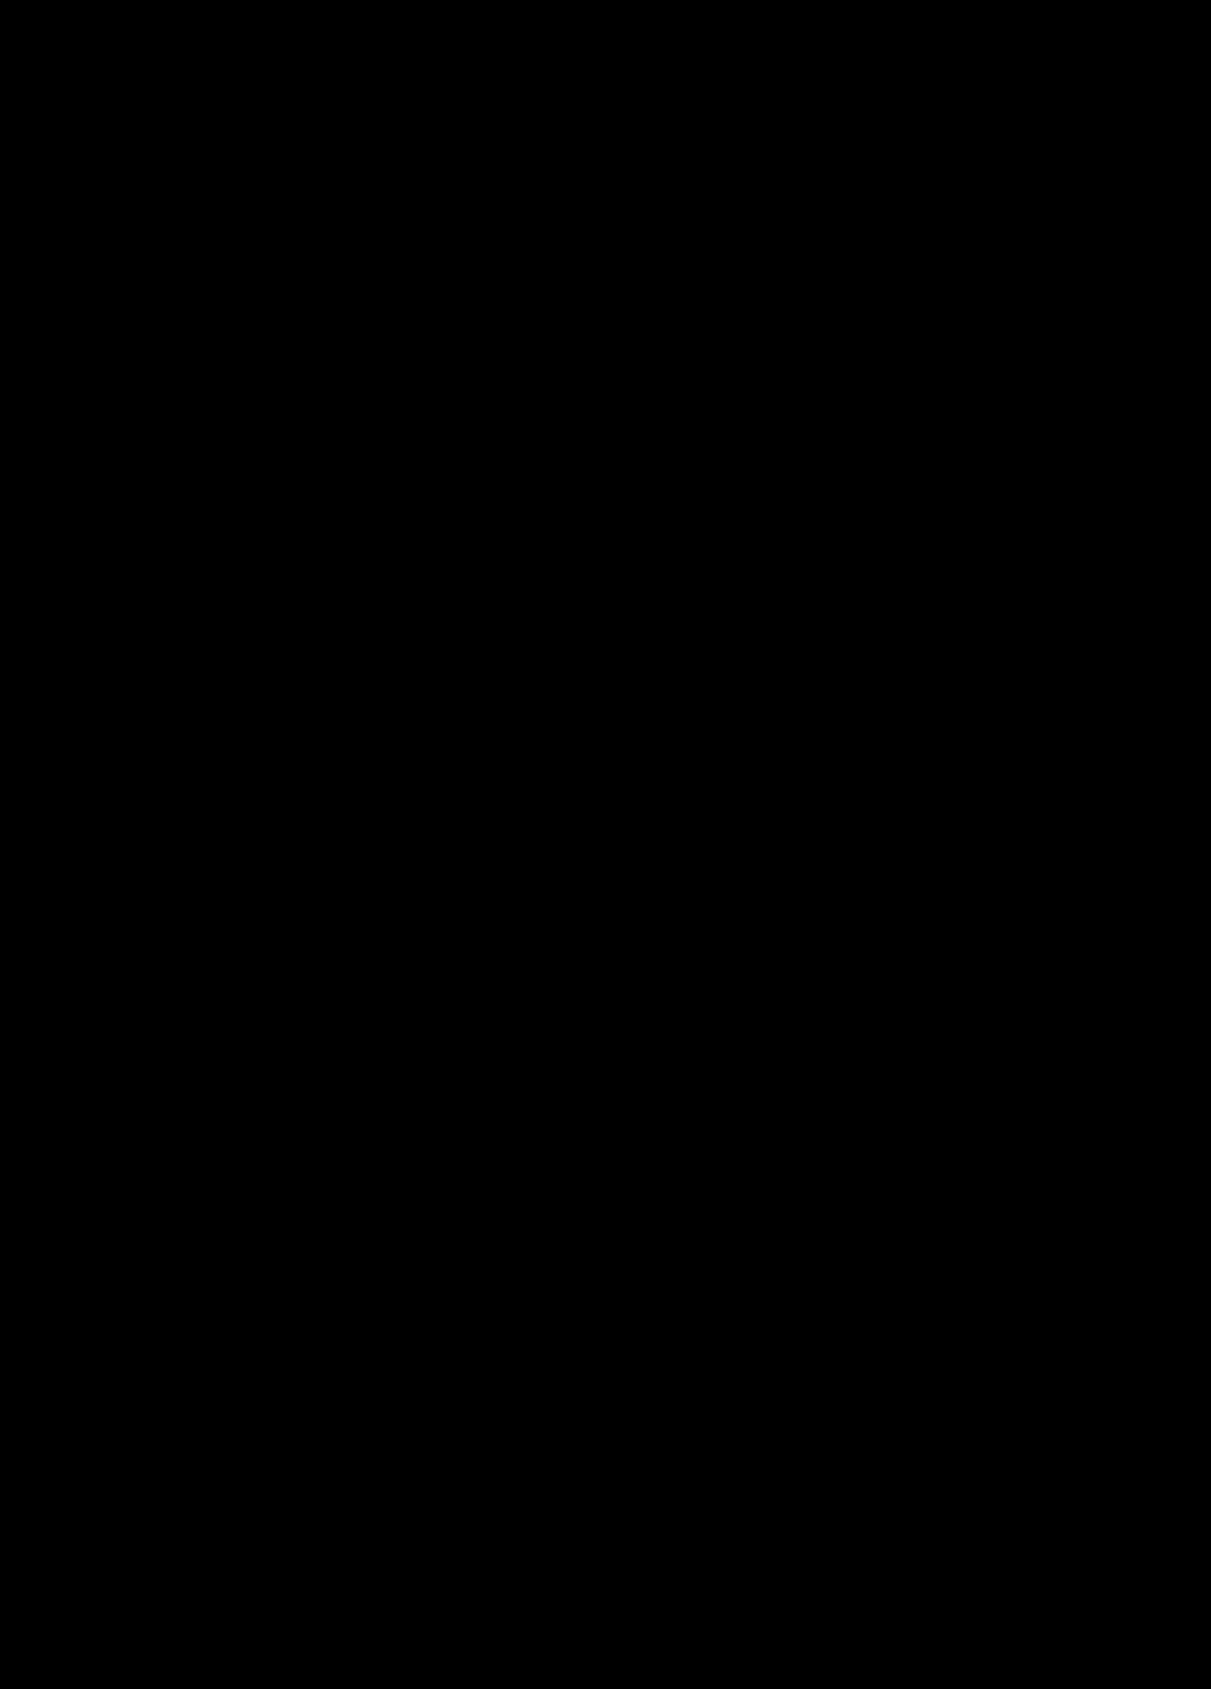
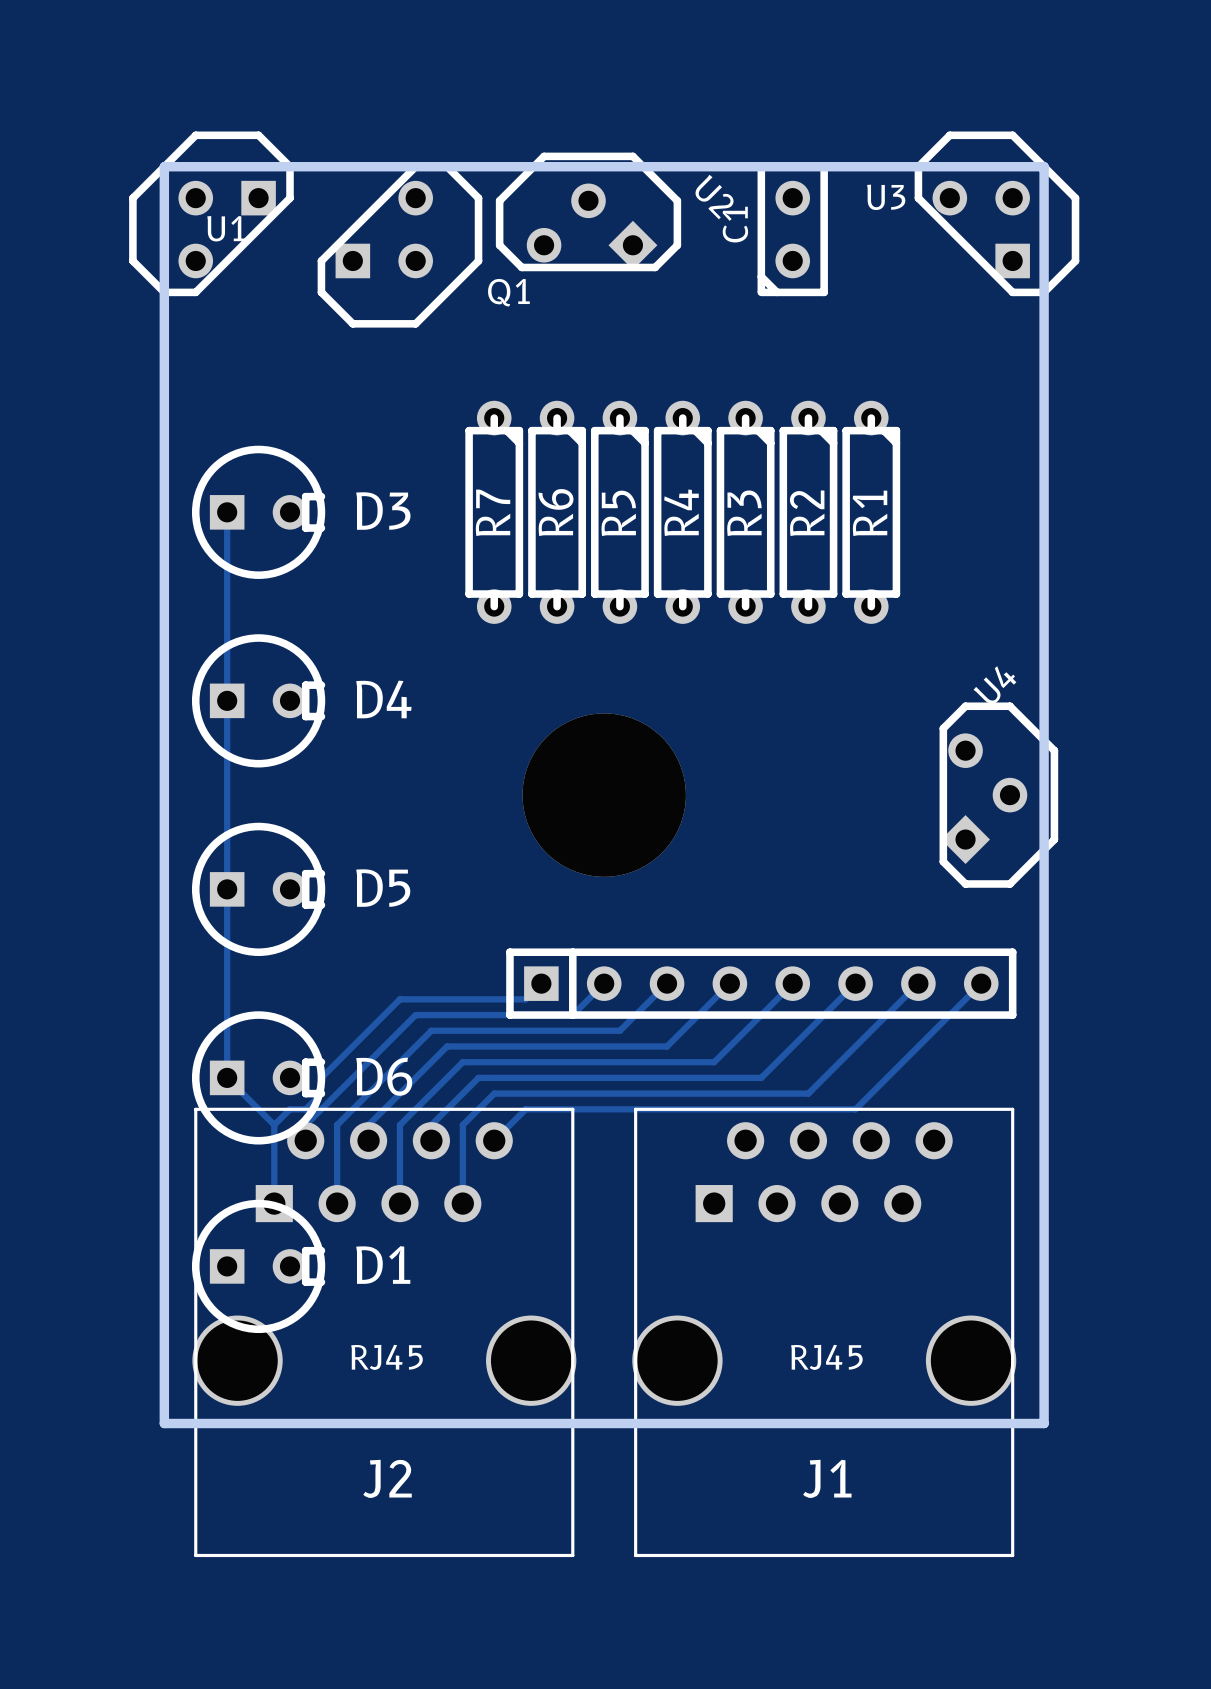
board edge: none -> (164, 166) (1044, 166) (1044, 1423) (164, 1423) (164, 166)
U2: none -> (588, 211)
U1: none -> (211, 213)
U3: none -> (996, 213)
C1: none -> (792, 229)
Q1: none -> (399, 245)
track: none -> (227, 512) (227, 1077) (274, 1125)
D3: none -> (258, 512)
R7: none -> (494, 512)
R6: none -> (557, 512)
R5: none -> (619, 512)
R4: none -> (682, 512)
R3: none -> (745, 512)
R2: none -> (808, 512)
R1: none -> (871, 512)
D4: none -> (258, 700)
part: none -> (604, 795)
U4: none -> (998, 795)
D5: none -> (258, 889)
track: none -> (541, 983) (525, 999) (399, 999) (321, 1077) (321, 1093) (305, 1109) (290, 1109) (274, 1125)
track: none -> (604, 983) (572, 1015) (415, 1015) (305, 1125) (305, 1140)
track: none -> (667, 983) (619, 1030) (431, 1030) (337, 1125) (337, 1203)
track: none -> (729, 983) (667, 1046) (447, 1046) (368, 1125) (368, 1140)
part: none -> (761, 983)
track: none -> (792, 983) (714, 1062) (462, 1062) (399, 1125) (399, 1203)
track: none -> (855, 983) (761, 1077) (478, 1077) (431, 1125) (431, 1140)
track: none -> (918, 983) (808, 1093) (494, 1093) (462, 1125) (462, 1203)
track: none -> (981, 983) (855, 1109) (525, 1109) (494, 1140)
D6: none -> (258, 1077)
track: none -> (274, 1125) (274, 1203)
D1: none -> (258, 1266)
J2: none -> RJ45 (384, 1332)
J1: none -> RJ45 (824, 1332)

